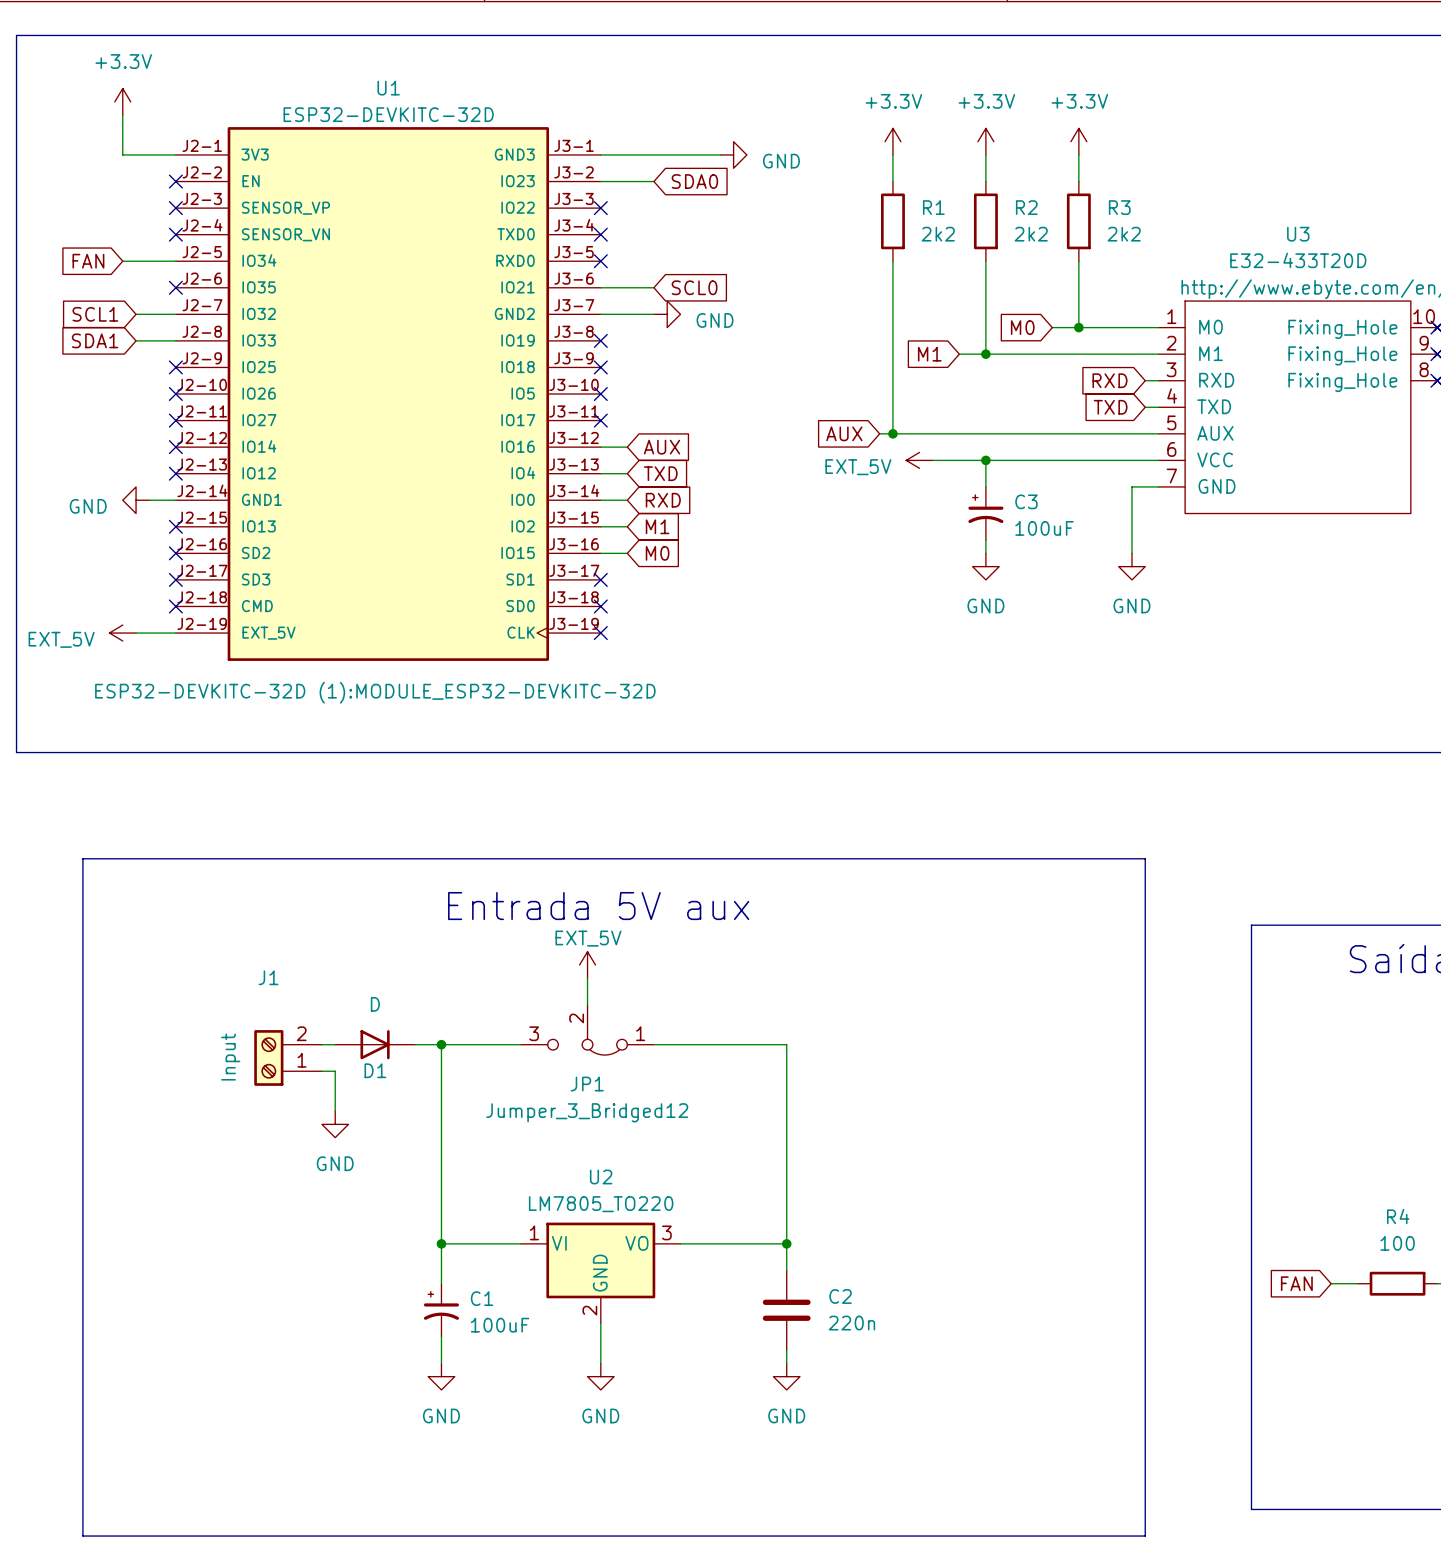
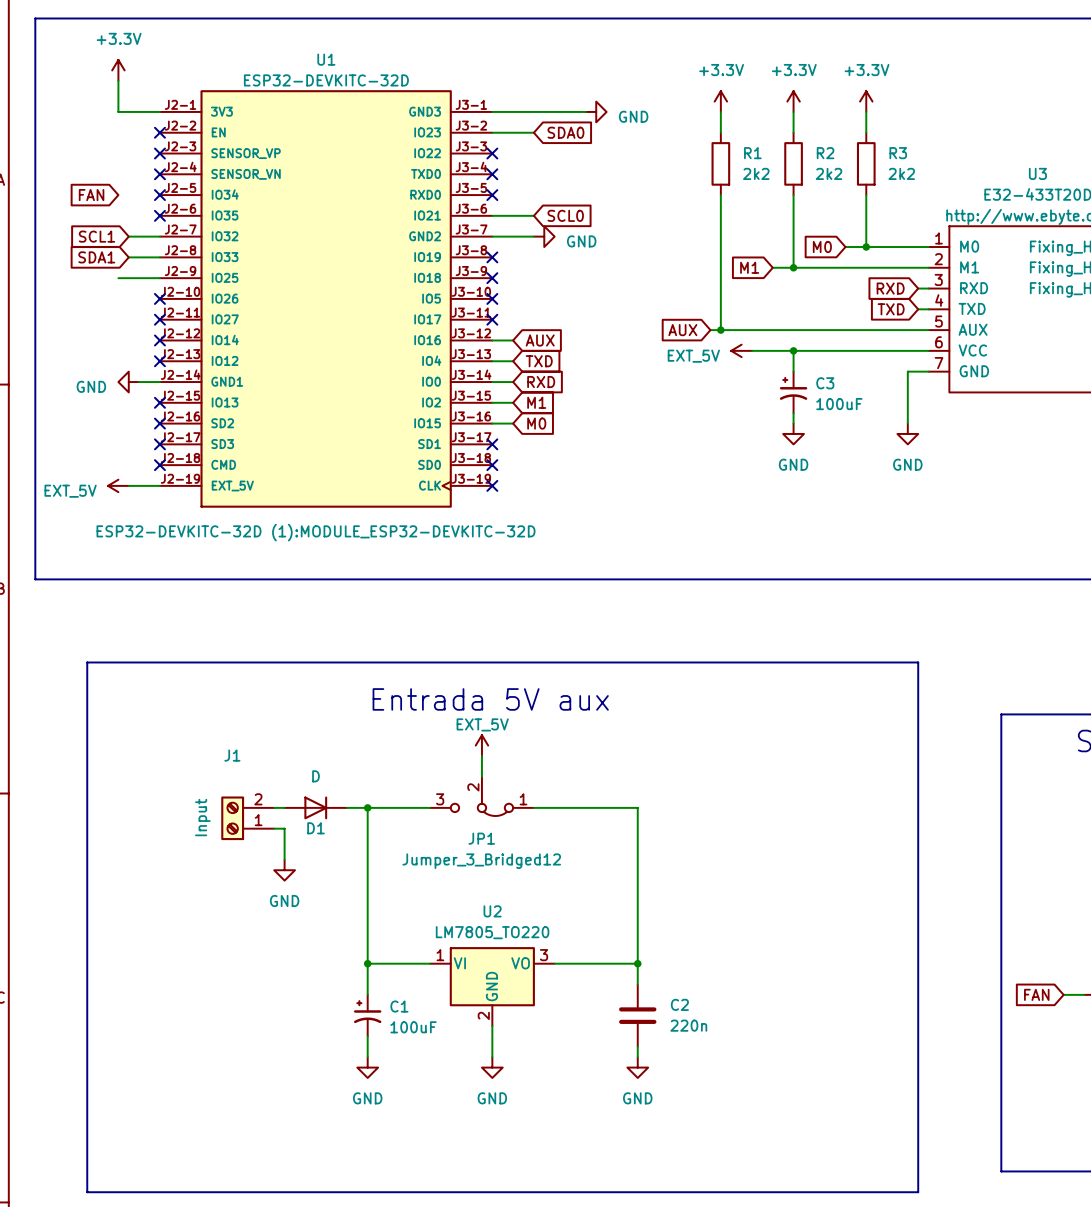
wire: (122, 261) (175, 261) -> (118, 278) (159, 278)
no-connect mark: none -> (159, 195)
no-connect mark: (175, 367) -> none

